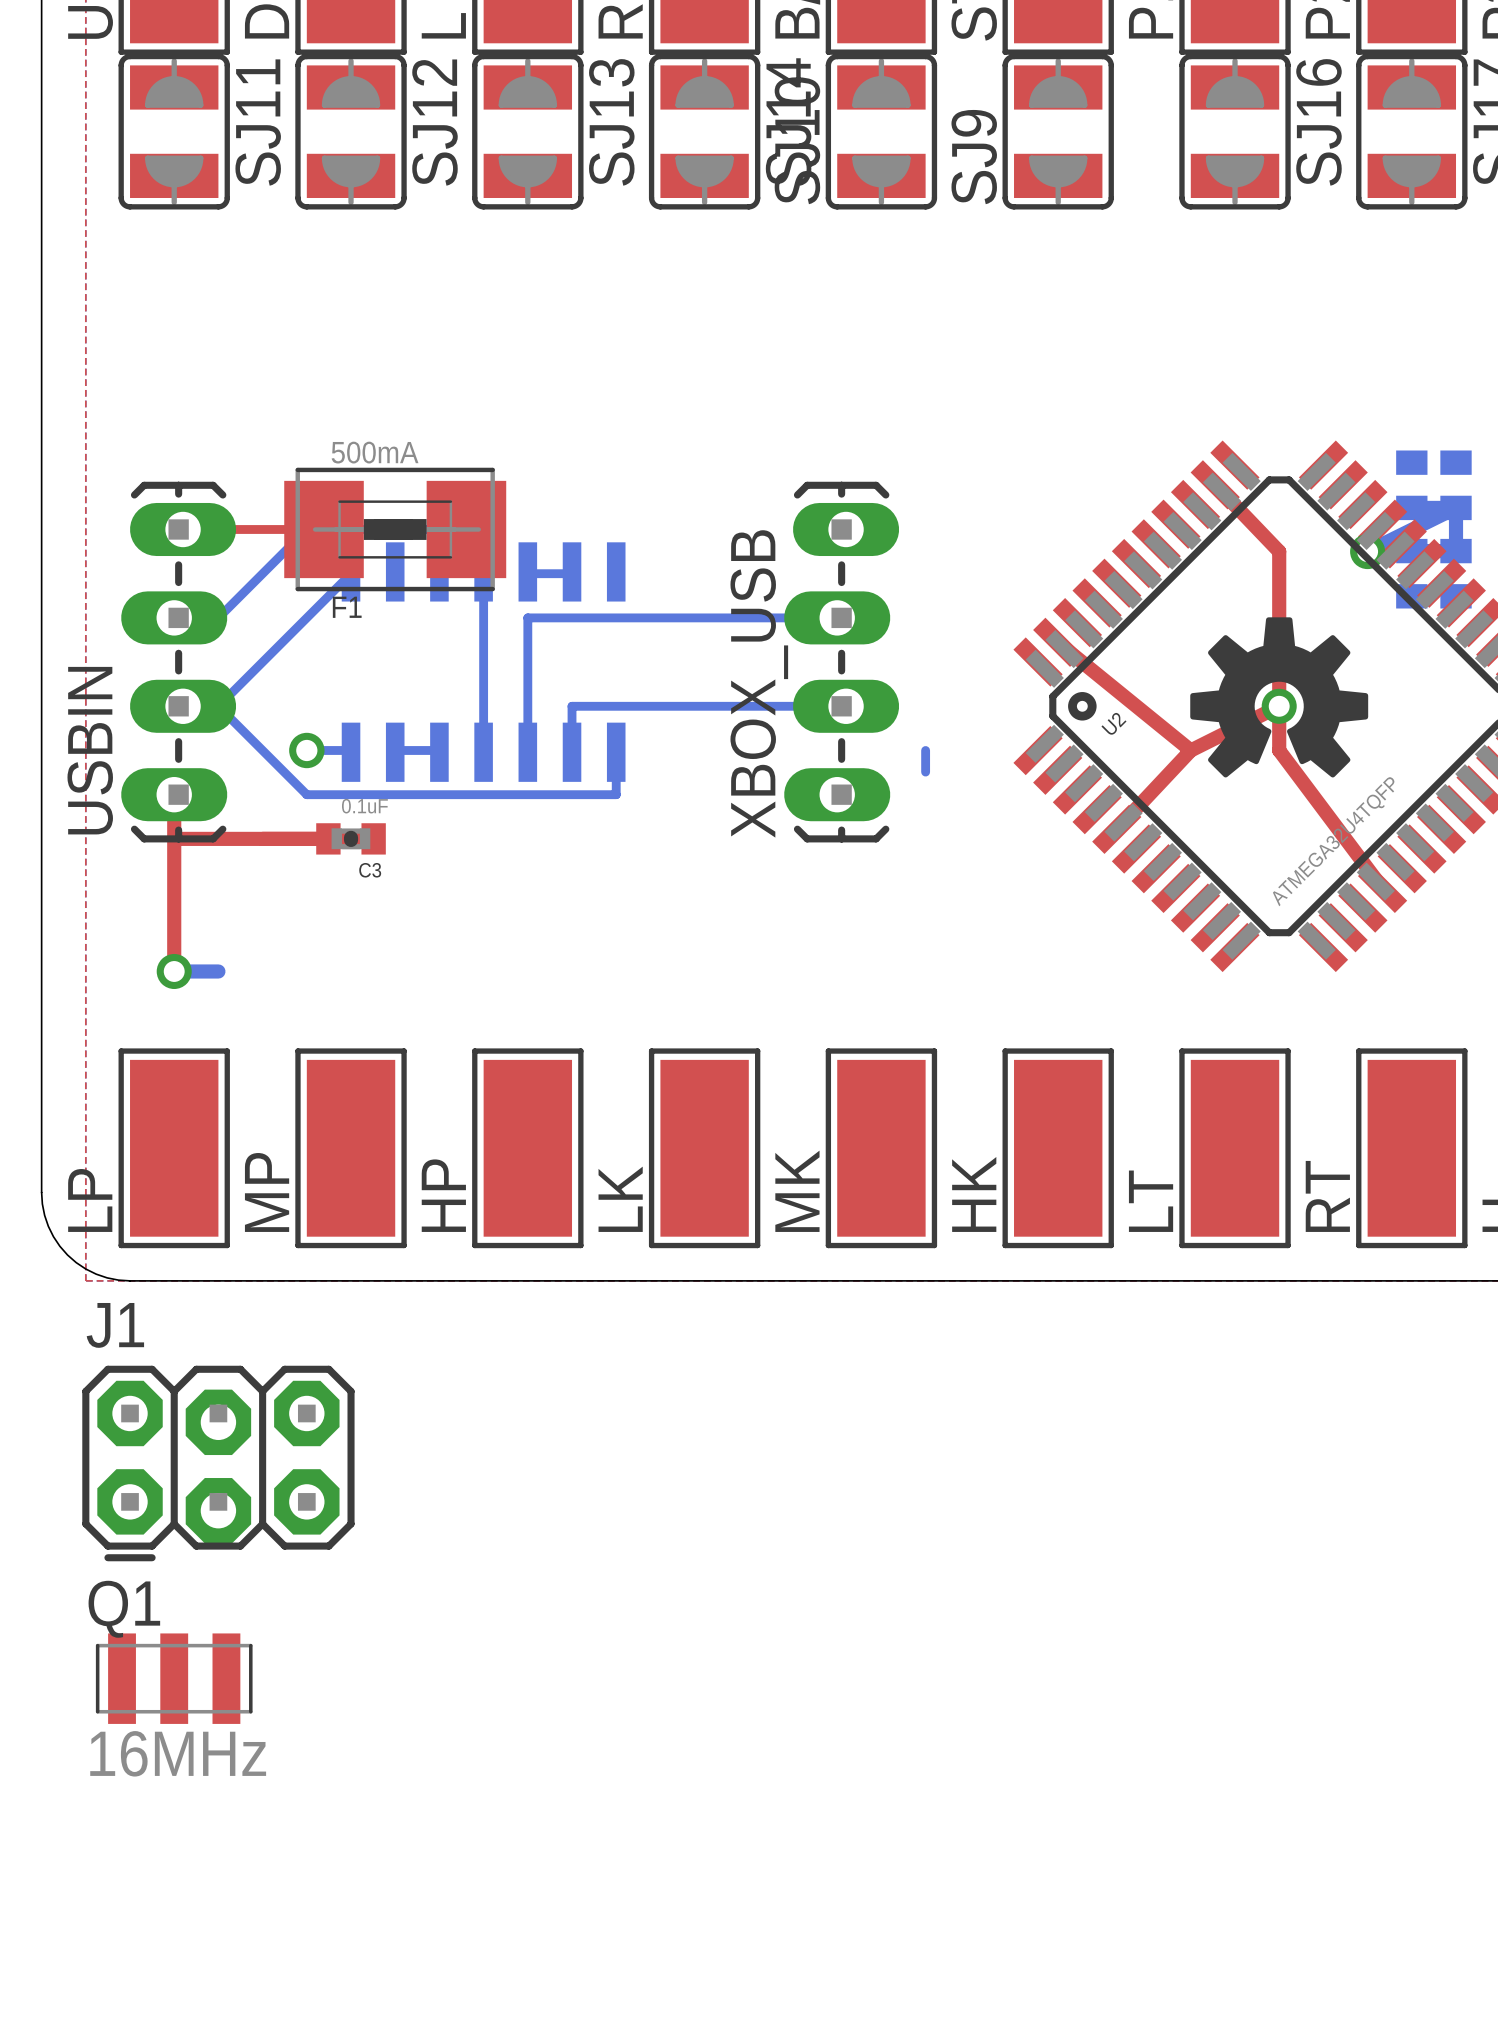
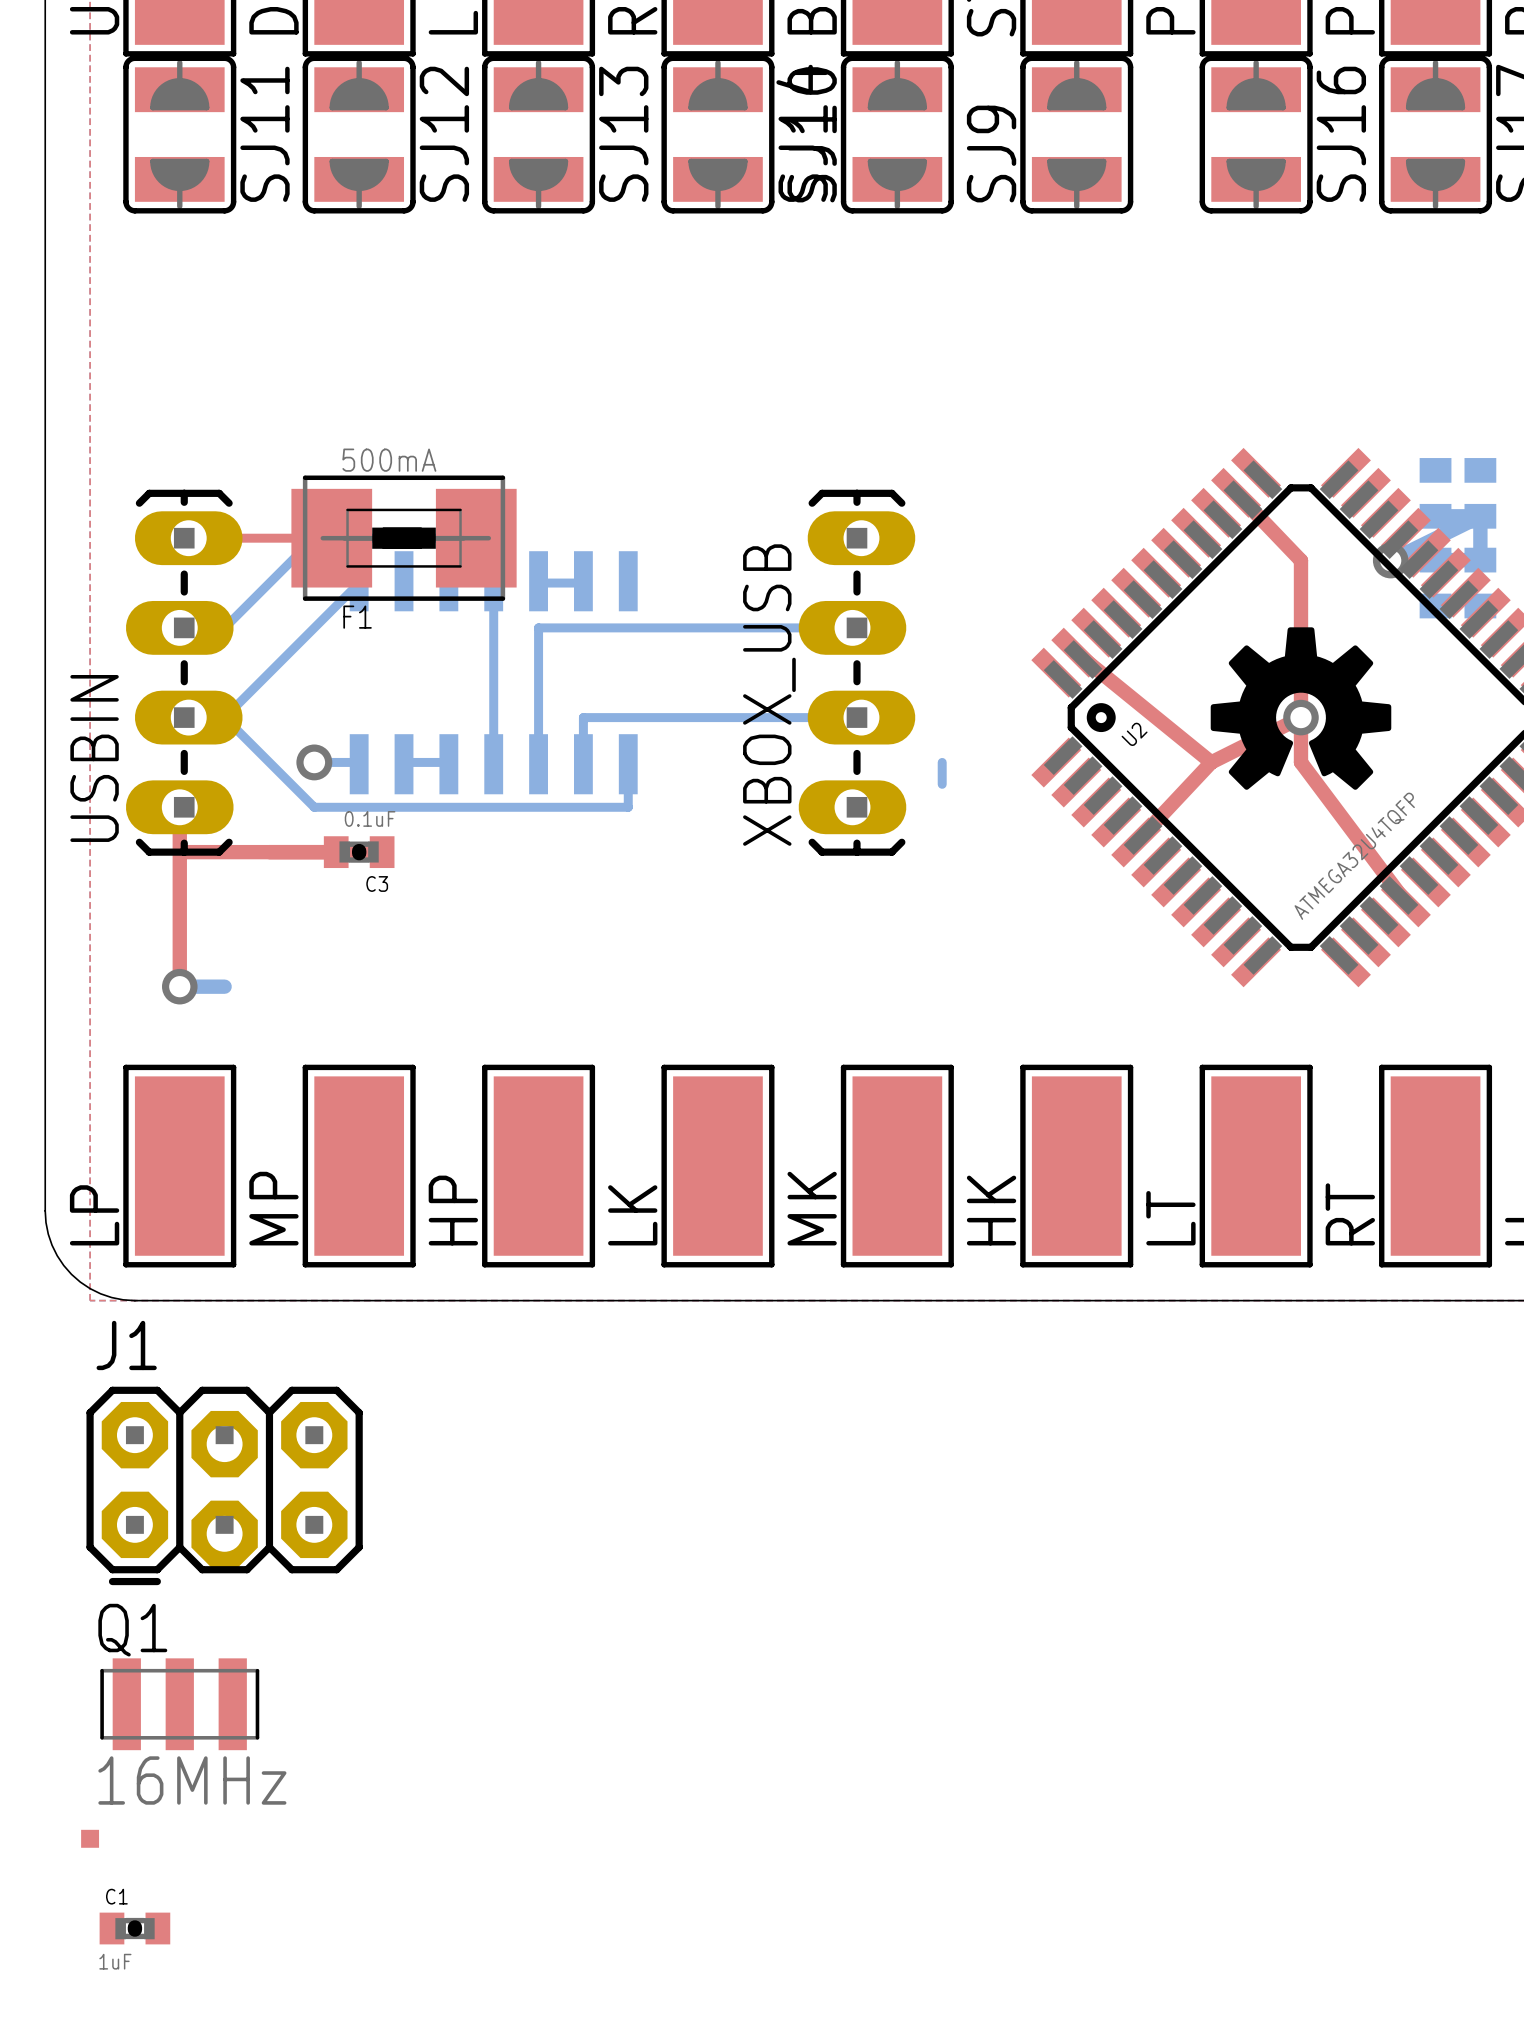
part: none -> (90, 1838)
C1: none -> 1uF (134, 1928)

